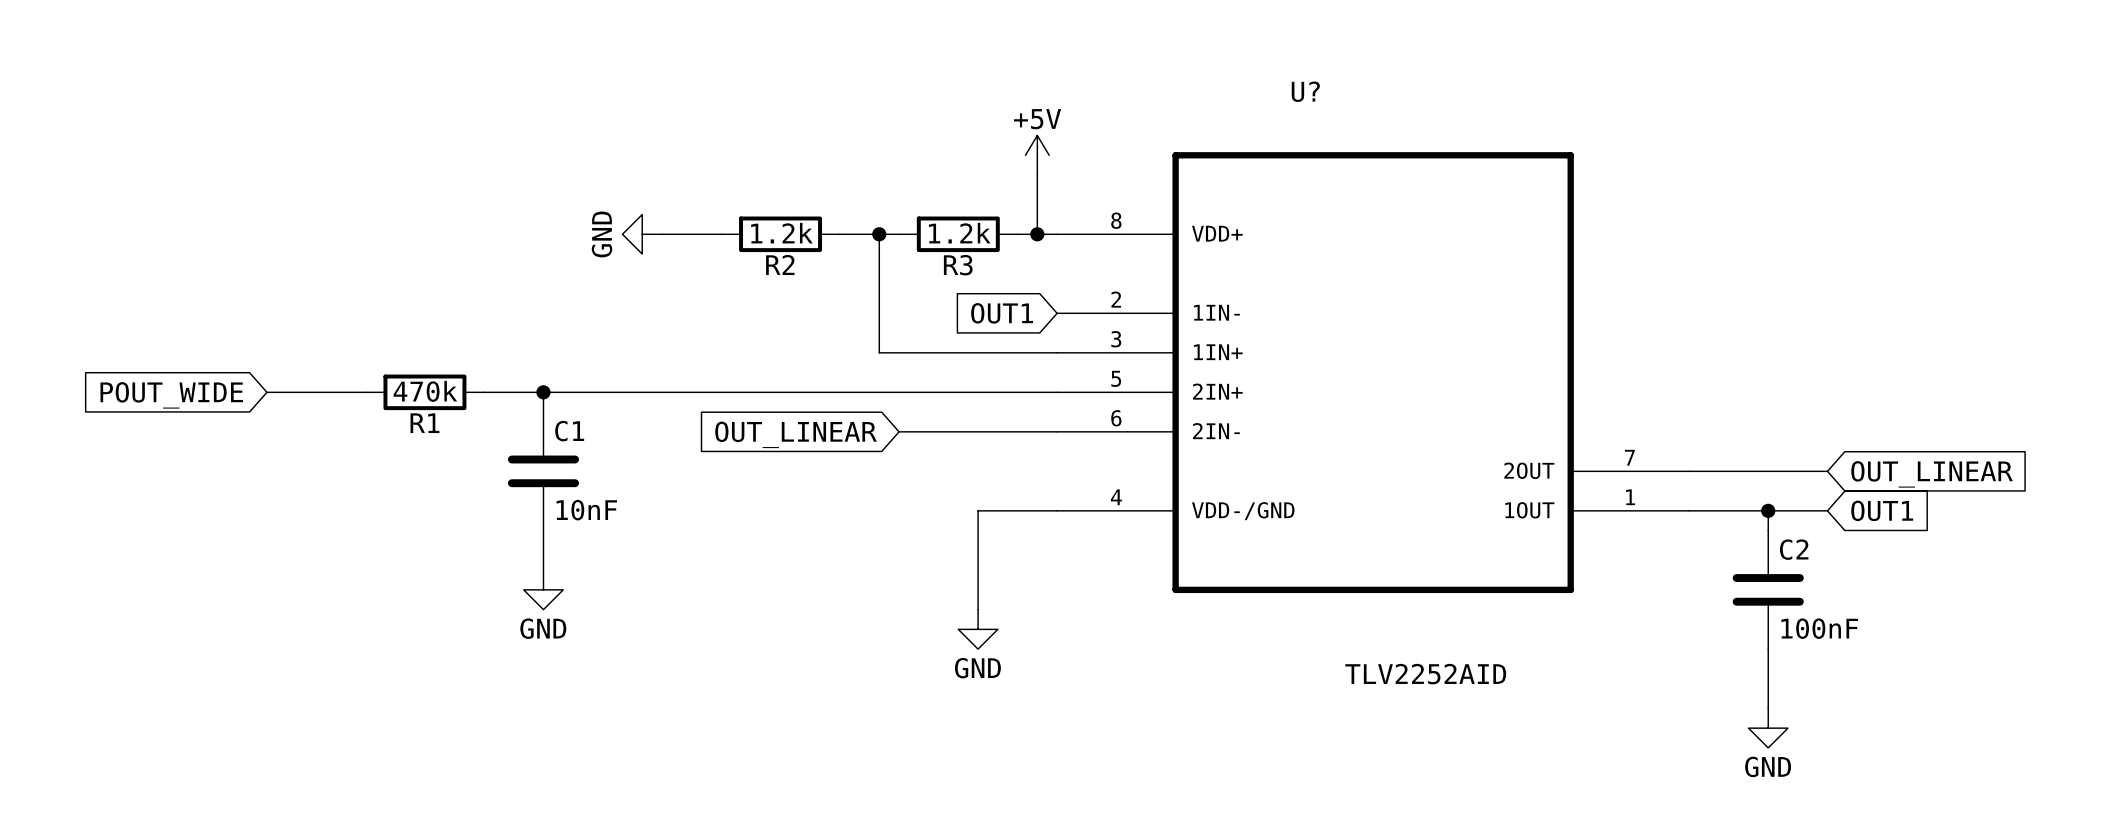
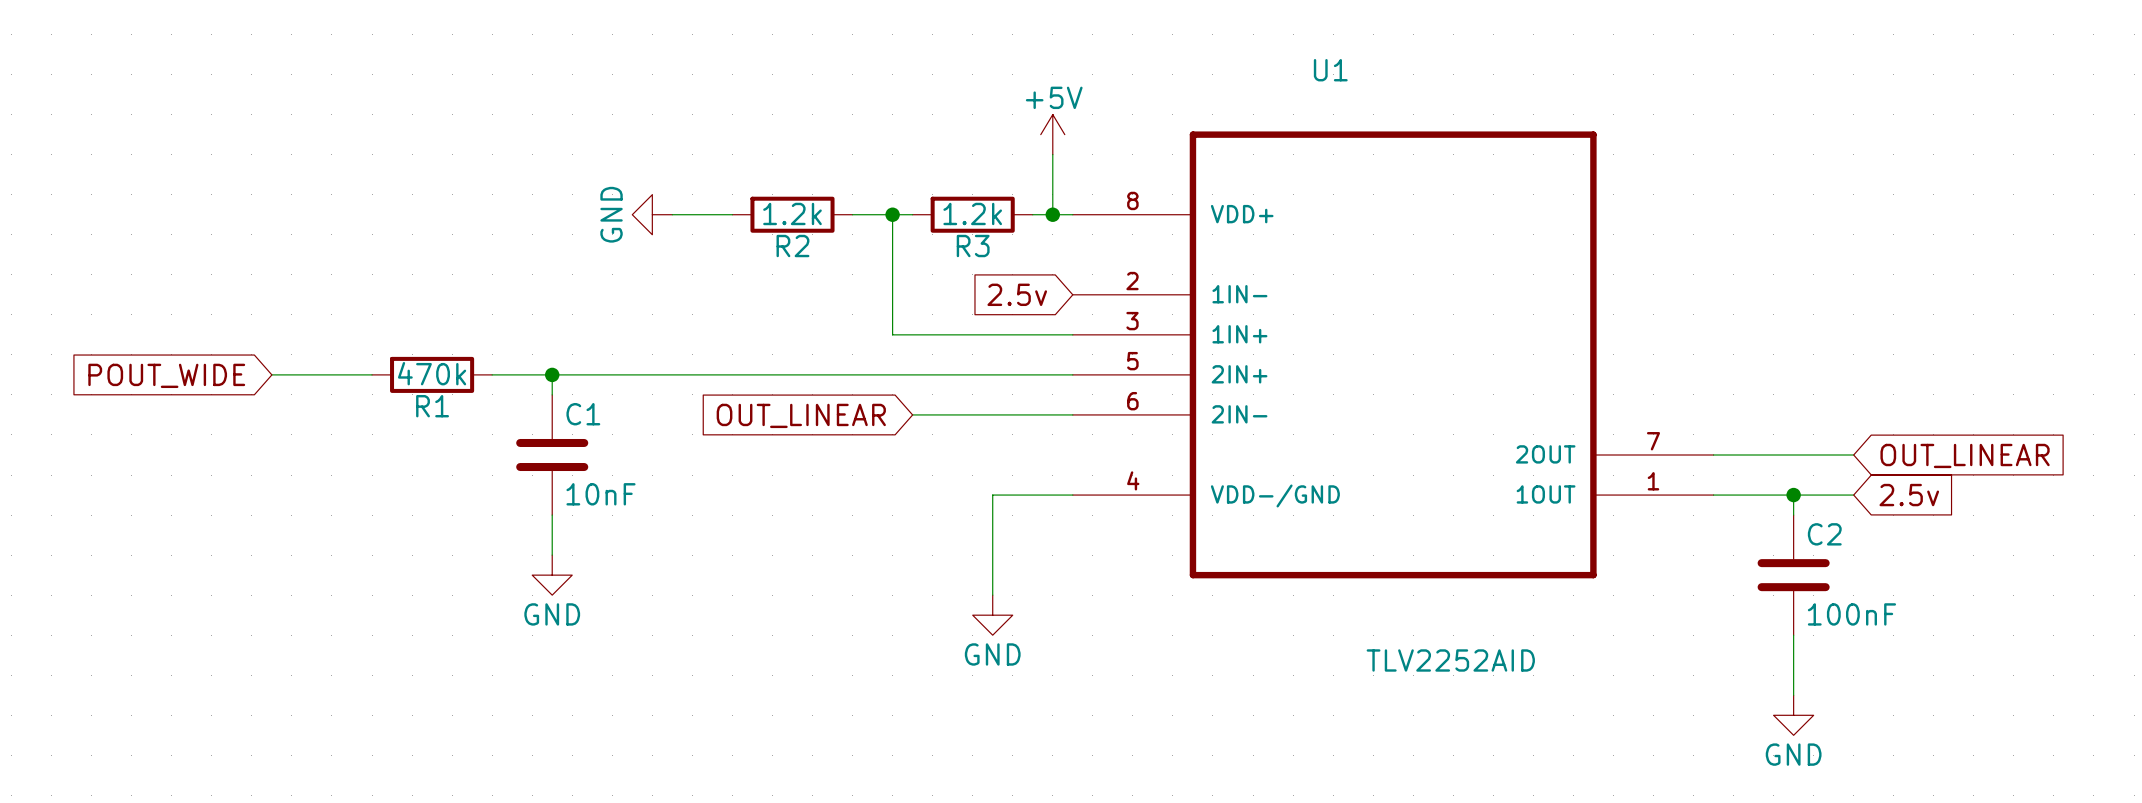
U? name: U? (1305, 91) -> U1 (1330, 70)
global label: OUT1 (1002, 313) -> 2.5v (1017, 294)
global label: OUT1 (1882, 510) -> 2.5v (1909, 495)

